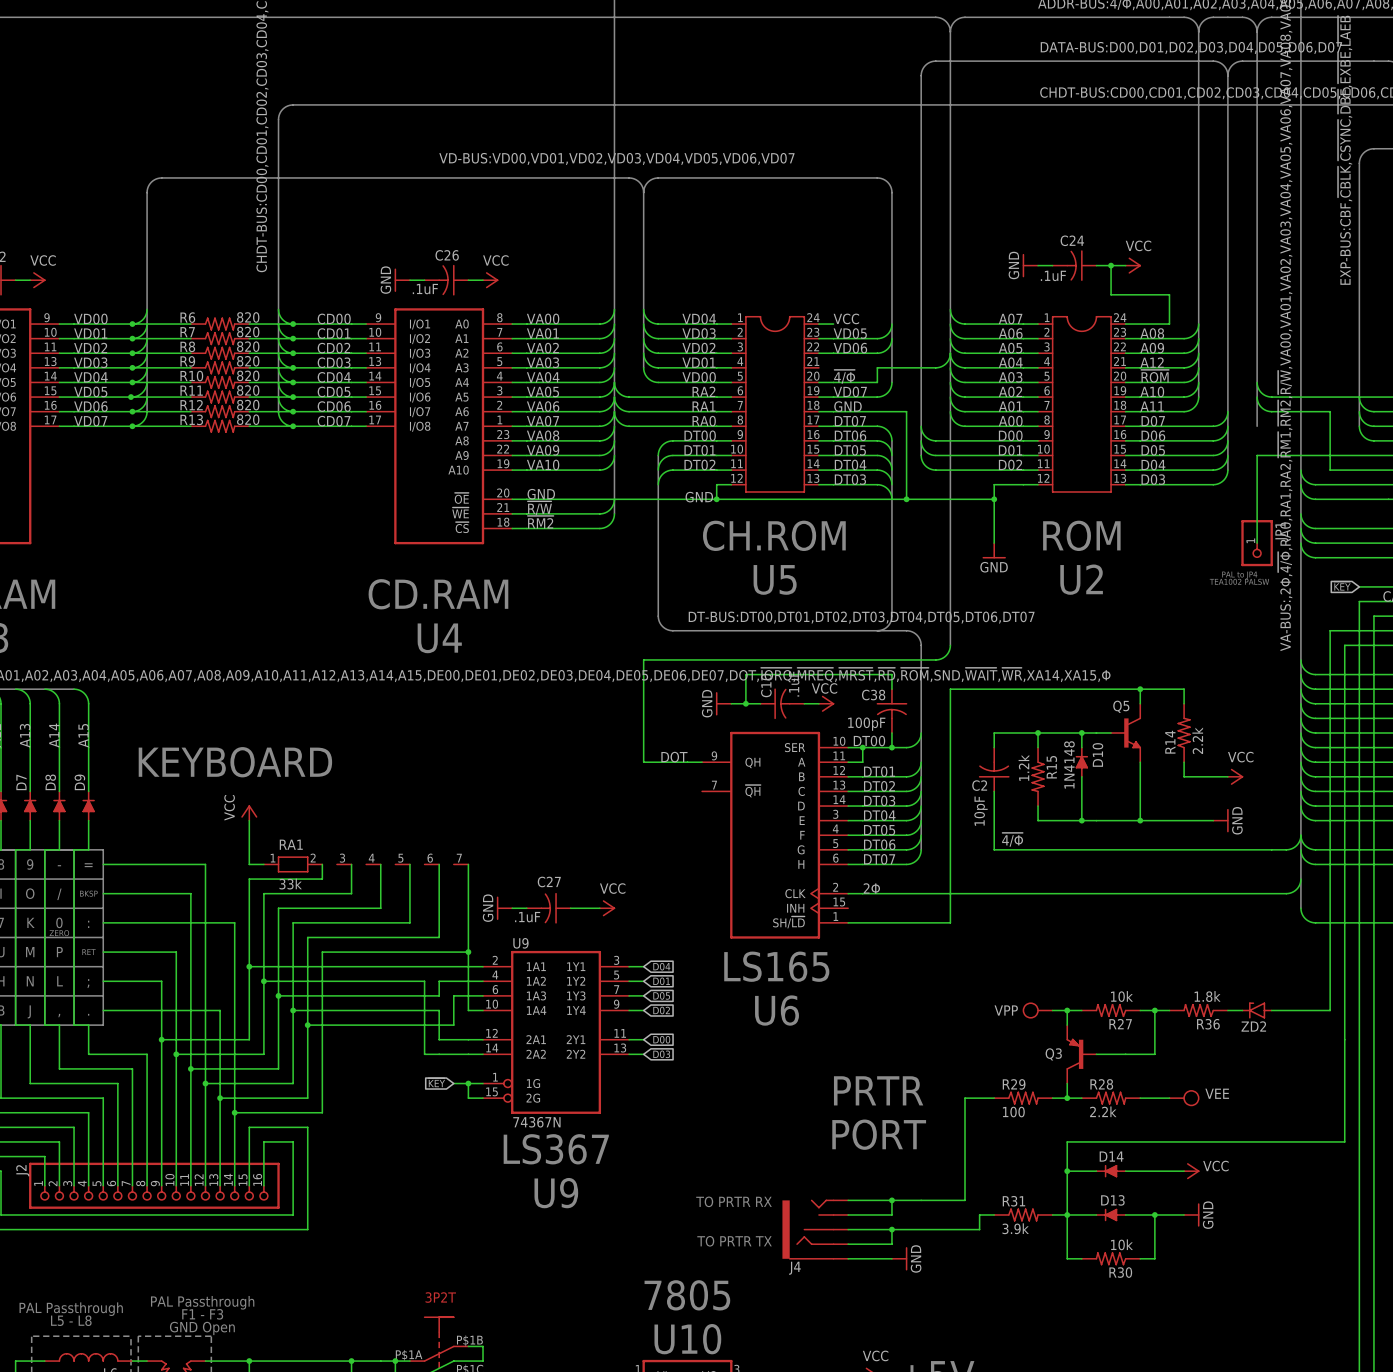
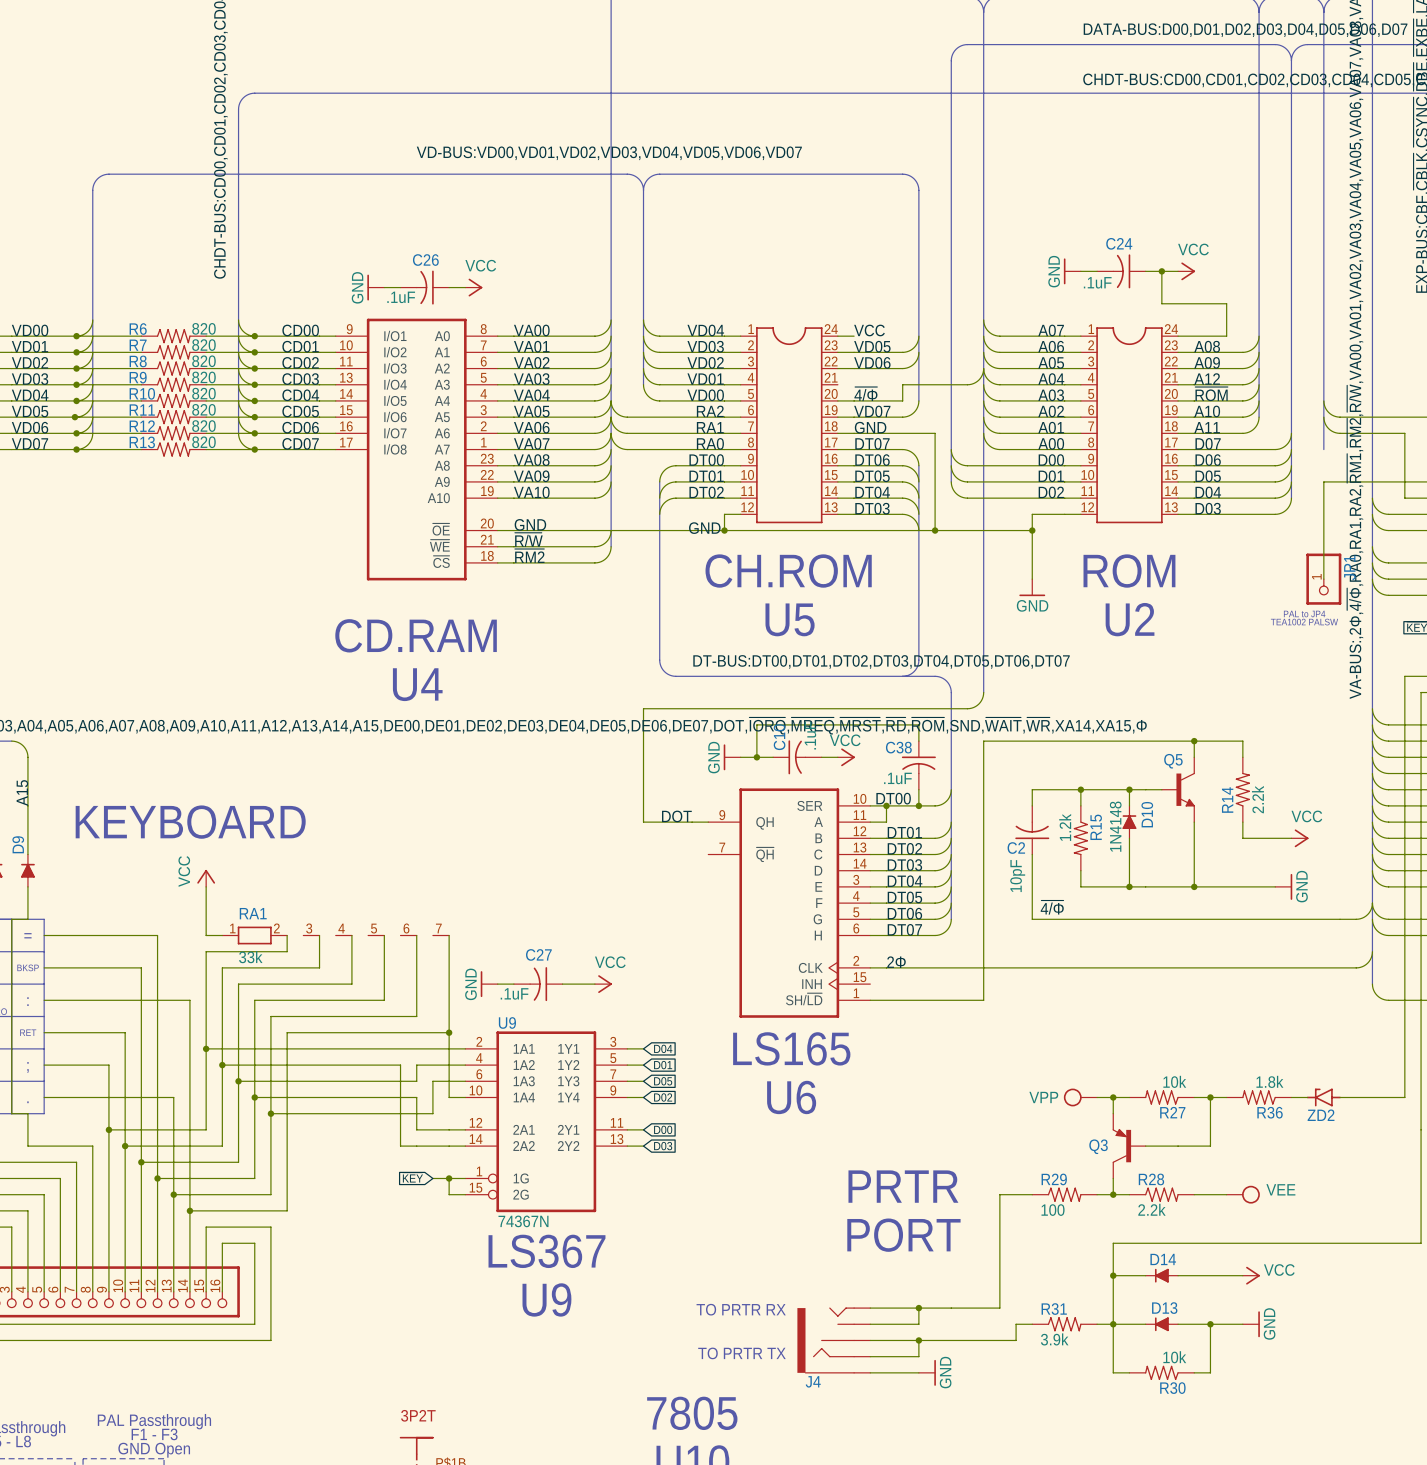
C38 value: 100pF (866, 724) -> .1uF (897, 778)

